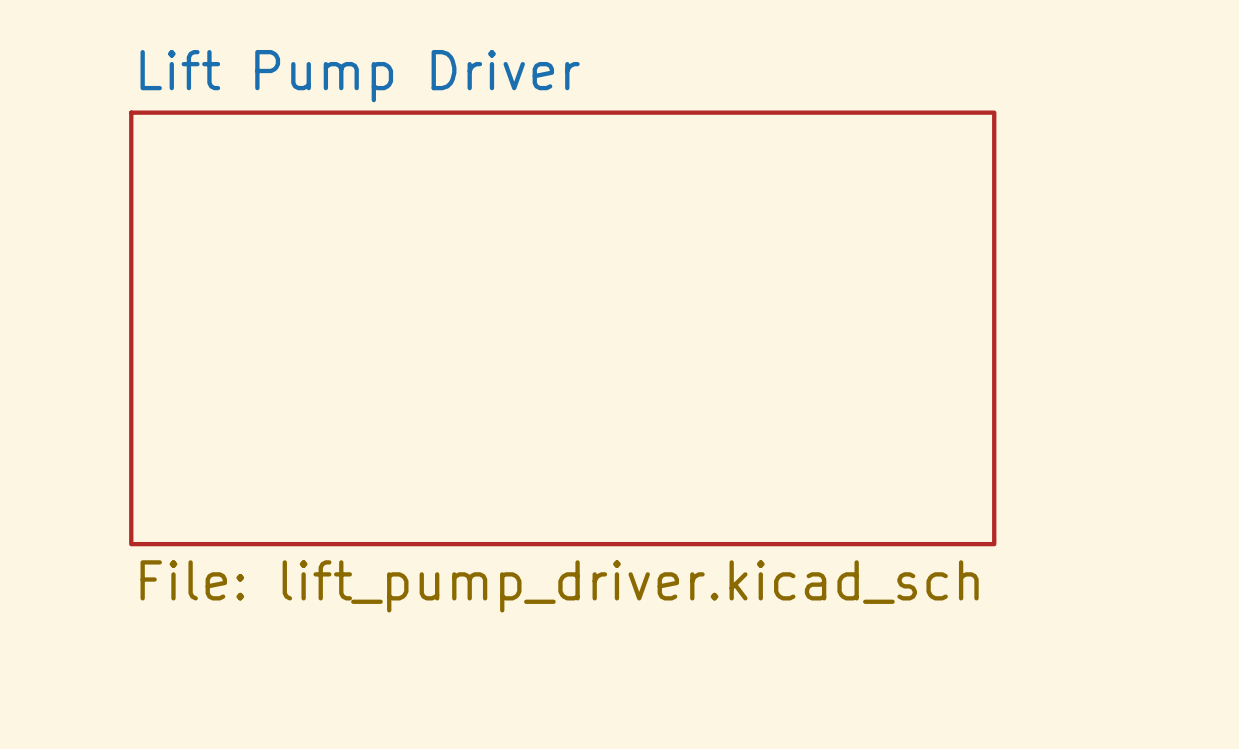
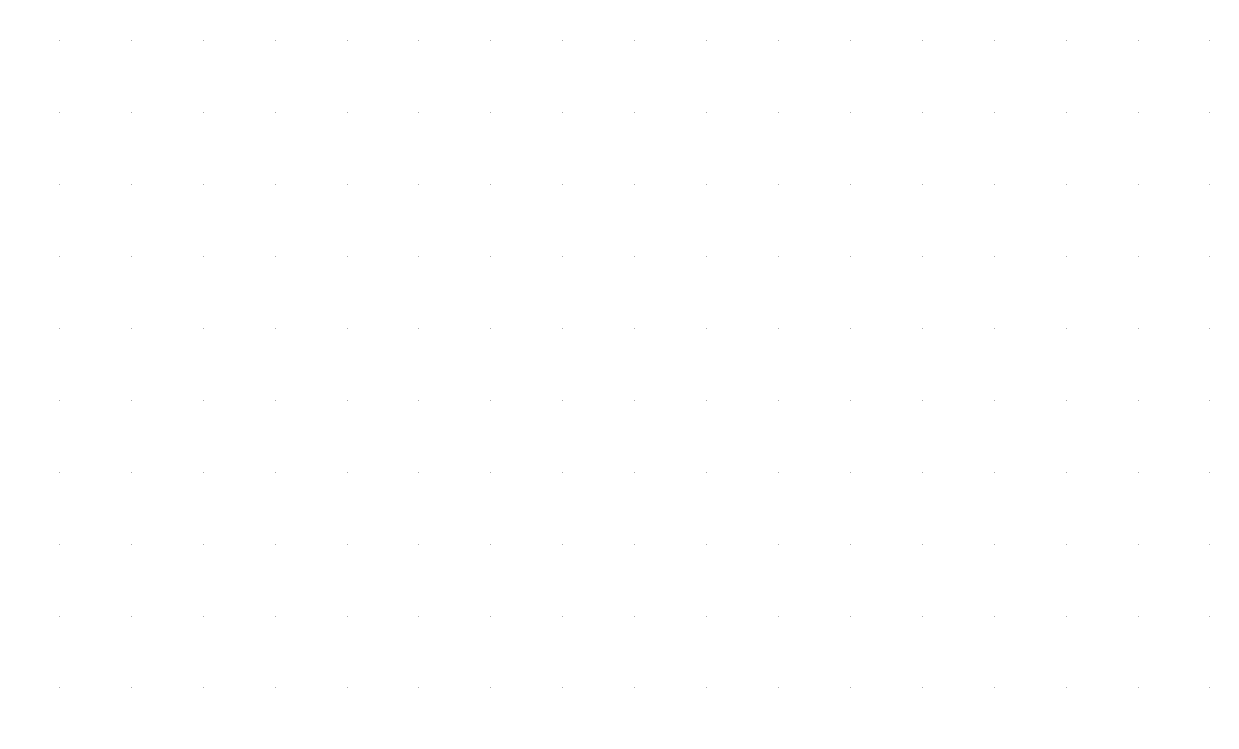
sheet Lift Pump Driver: File: lift_pump_driver.kicad_sch (562, 328) -> none

